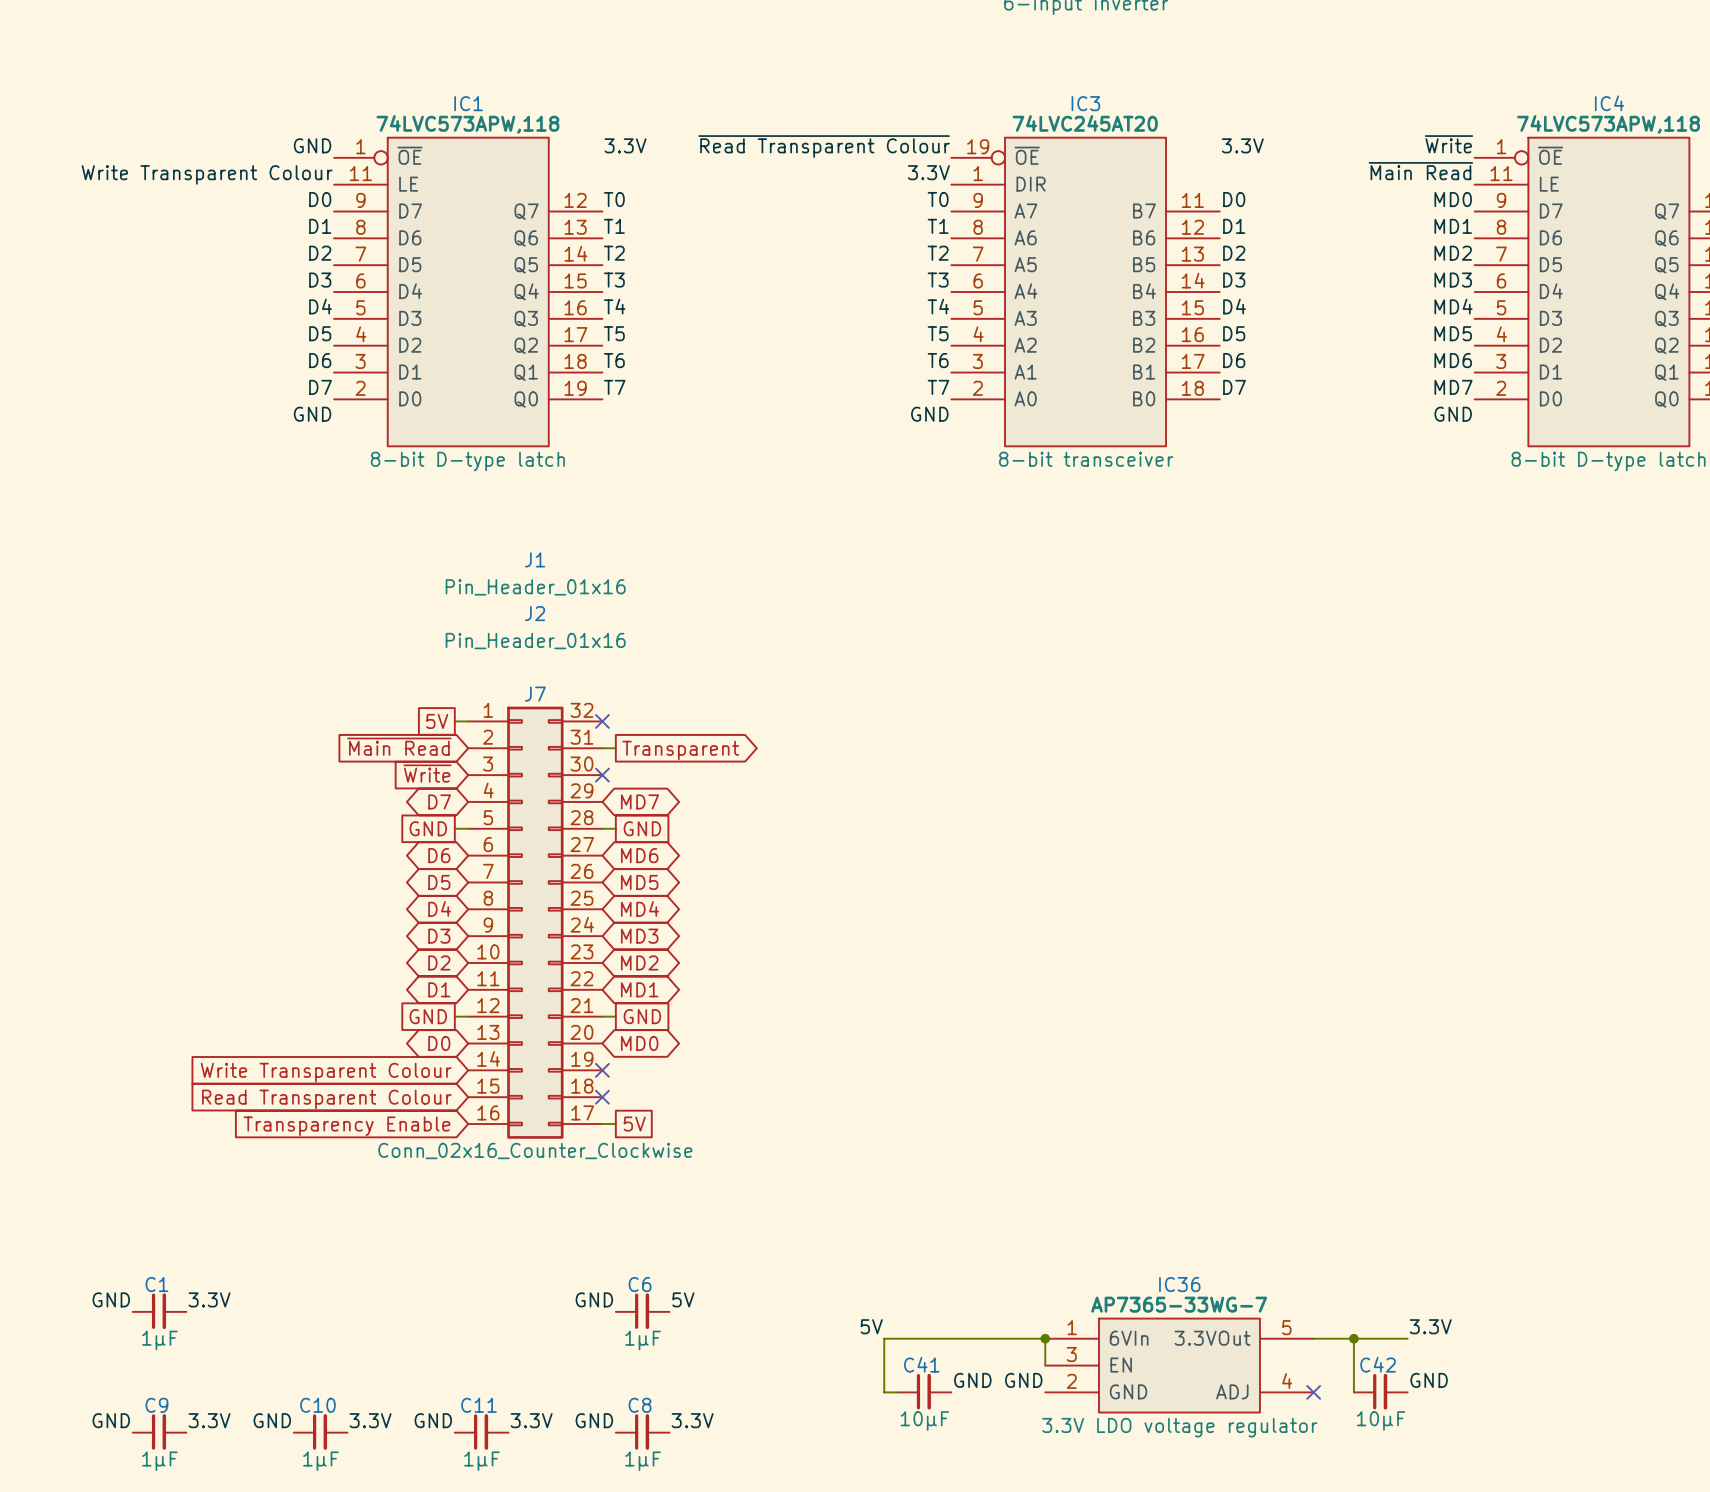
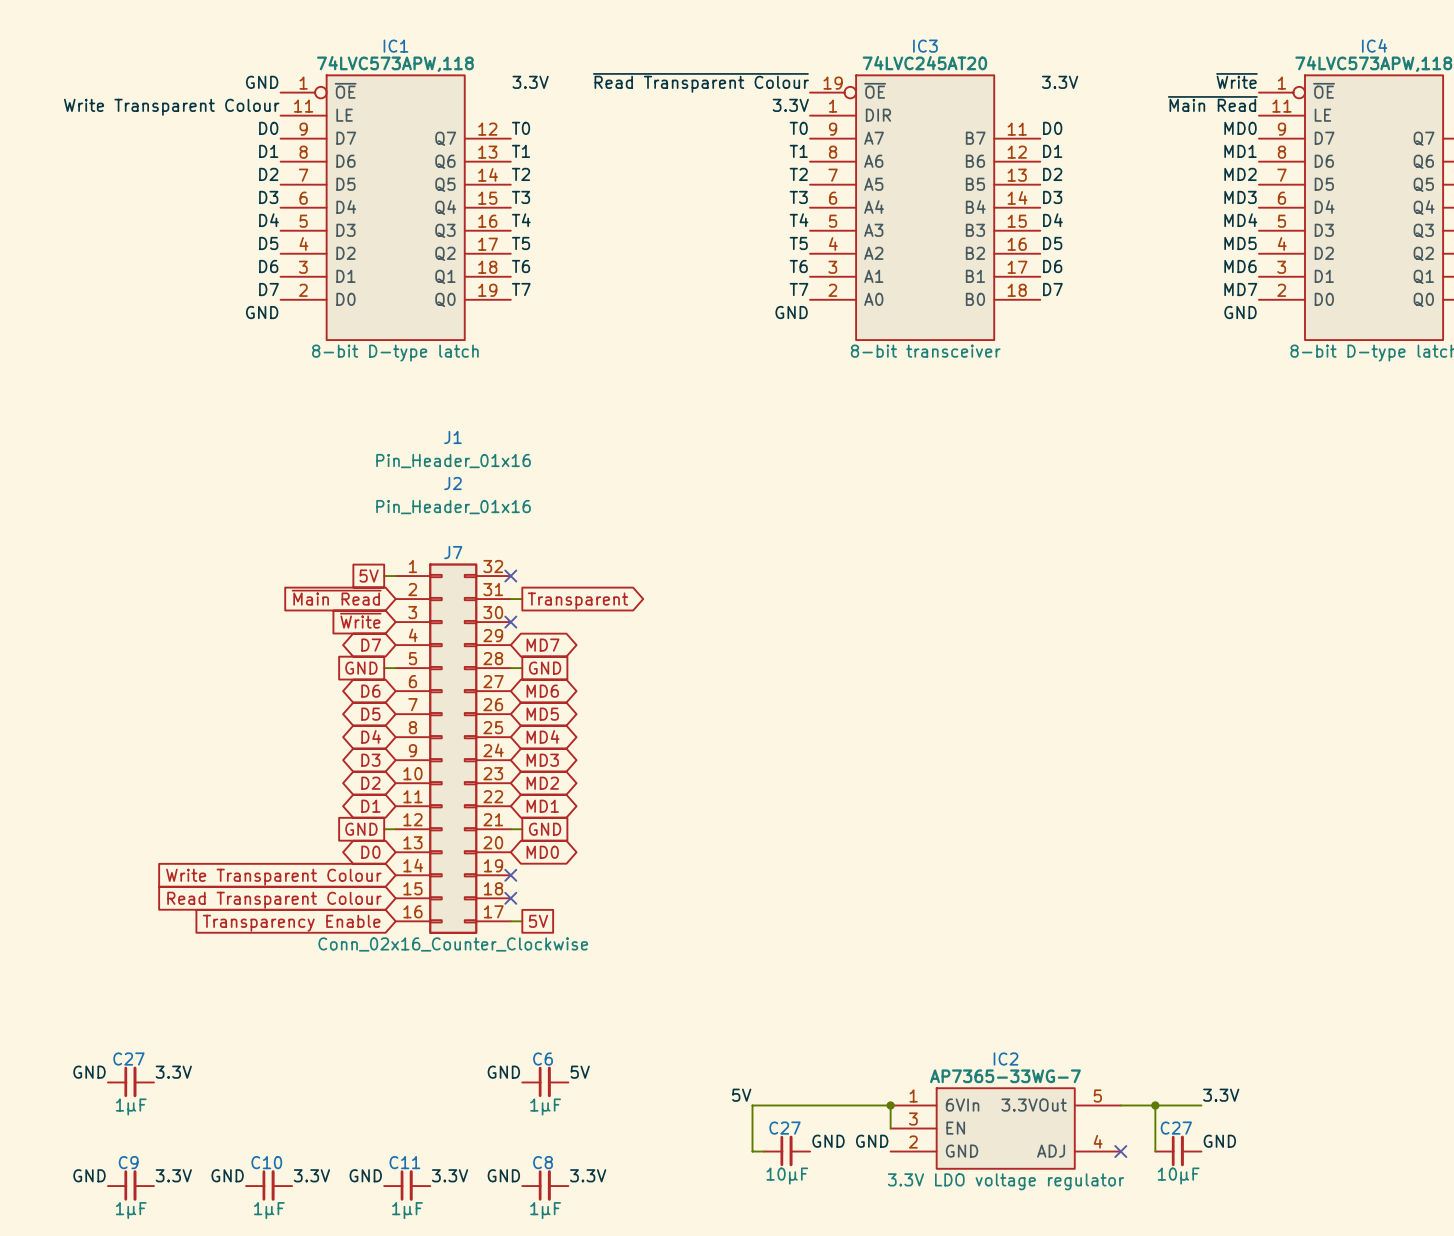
C1 name: C1 (156, 1284) -> C27 (128, 1059)
IC36 name: IC36 (1179, 1284) -> IC2 (1006, 1059)
C41 name: C41 (921, 1364) -> C27 (785, 1128)
C42 name: C42 (1378, 1364) -> C27 (1176, 1128)

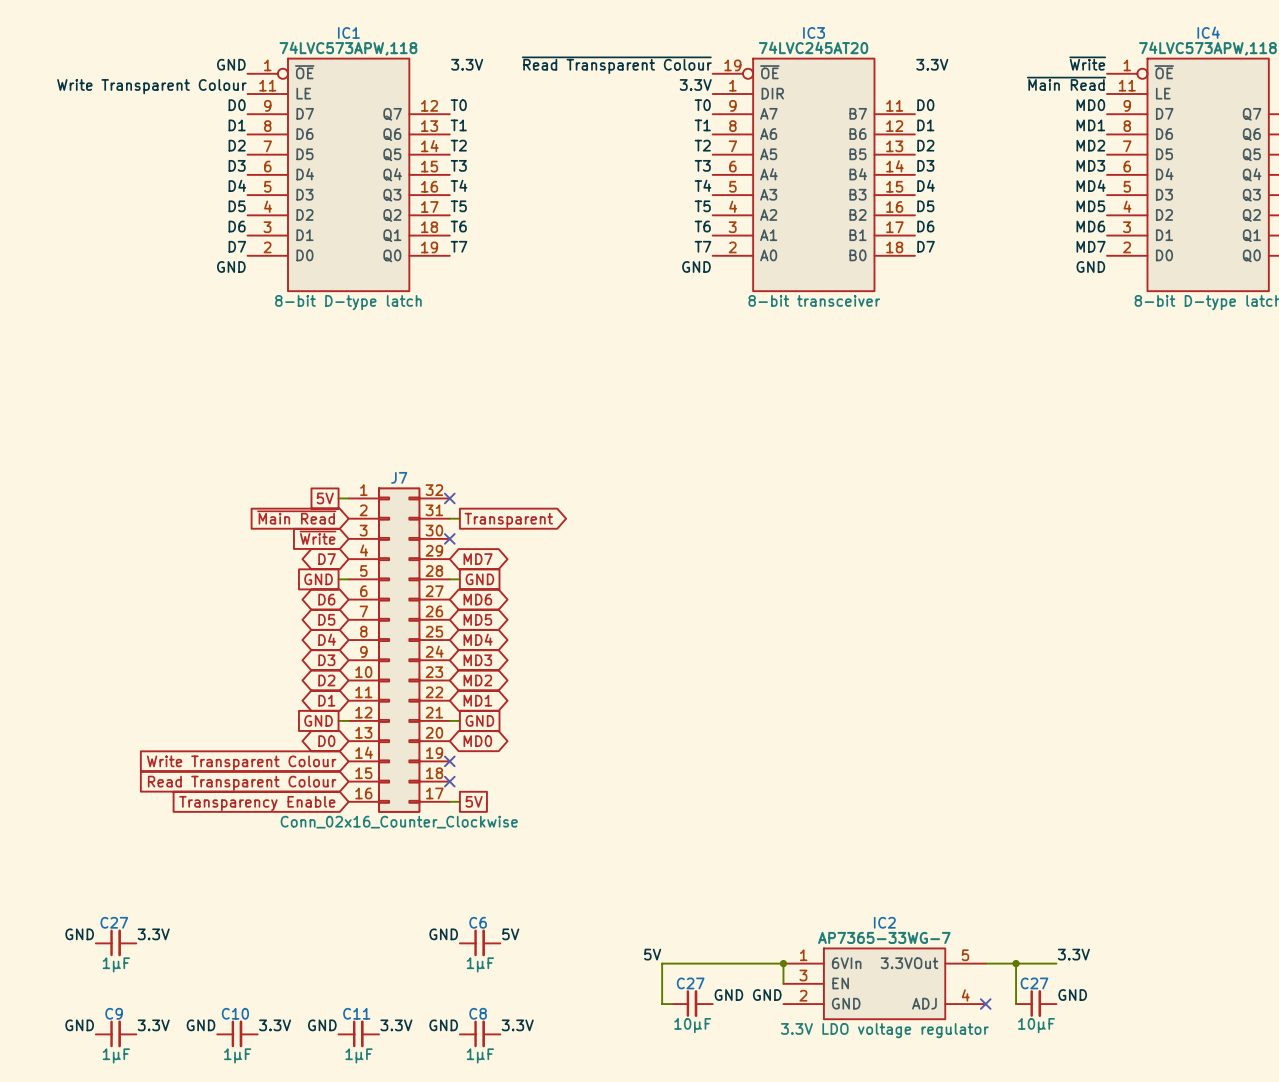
J1: Pin_Header_01x16 (453, 449) -> none
J2: Pin_Header_01x16 (453, 495) -> none

